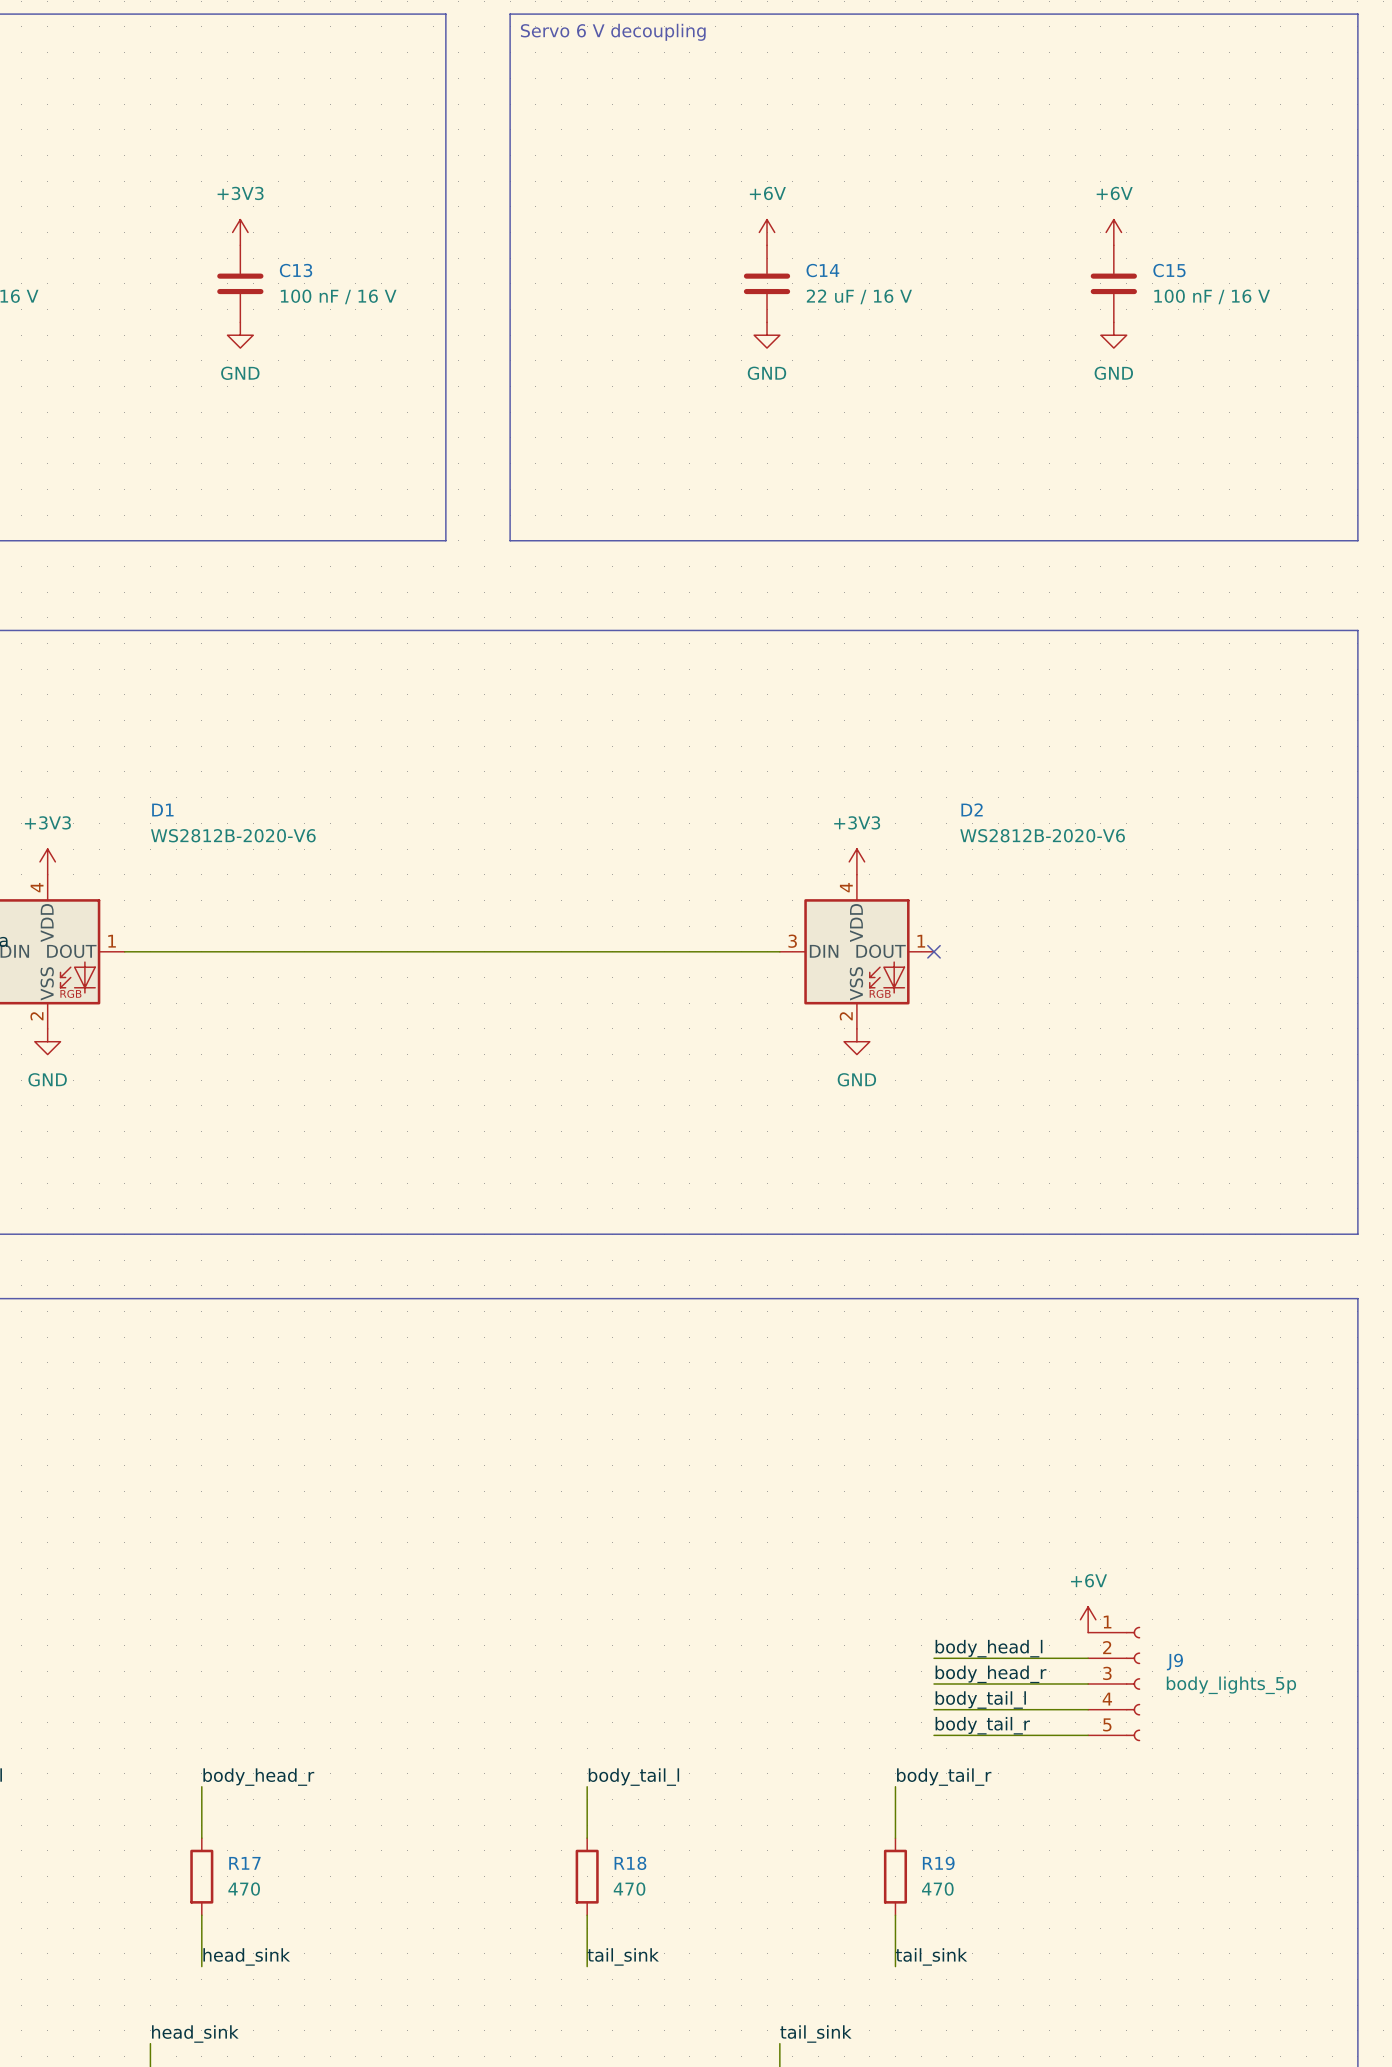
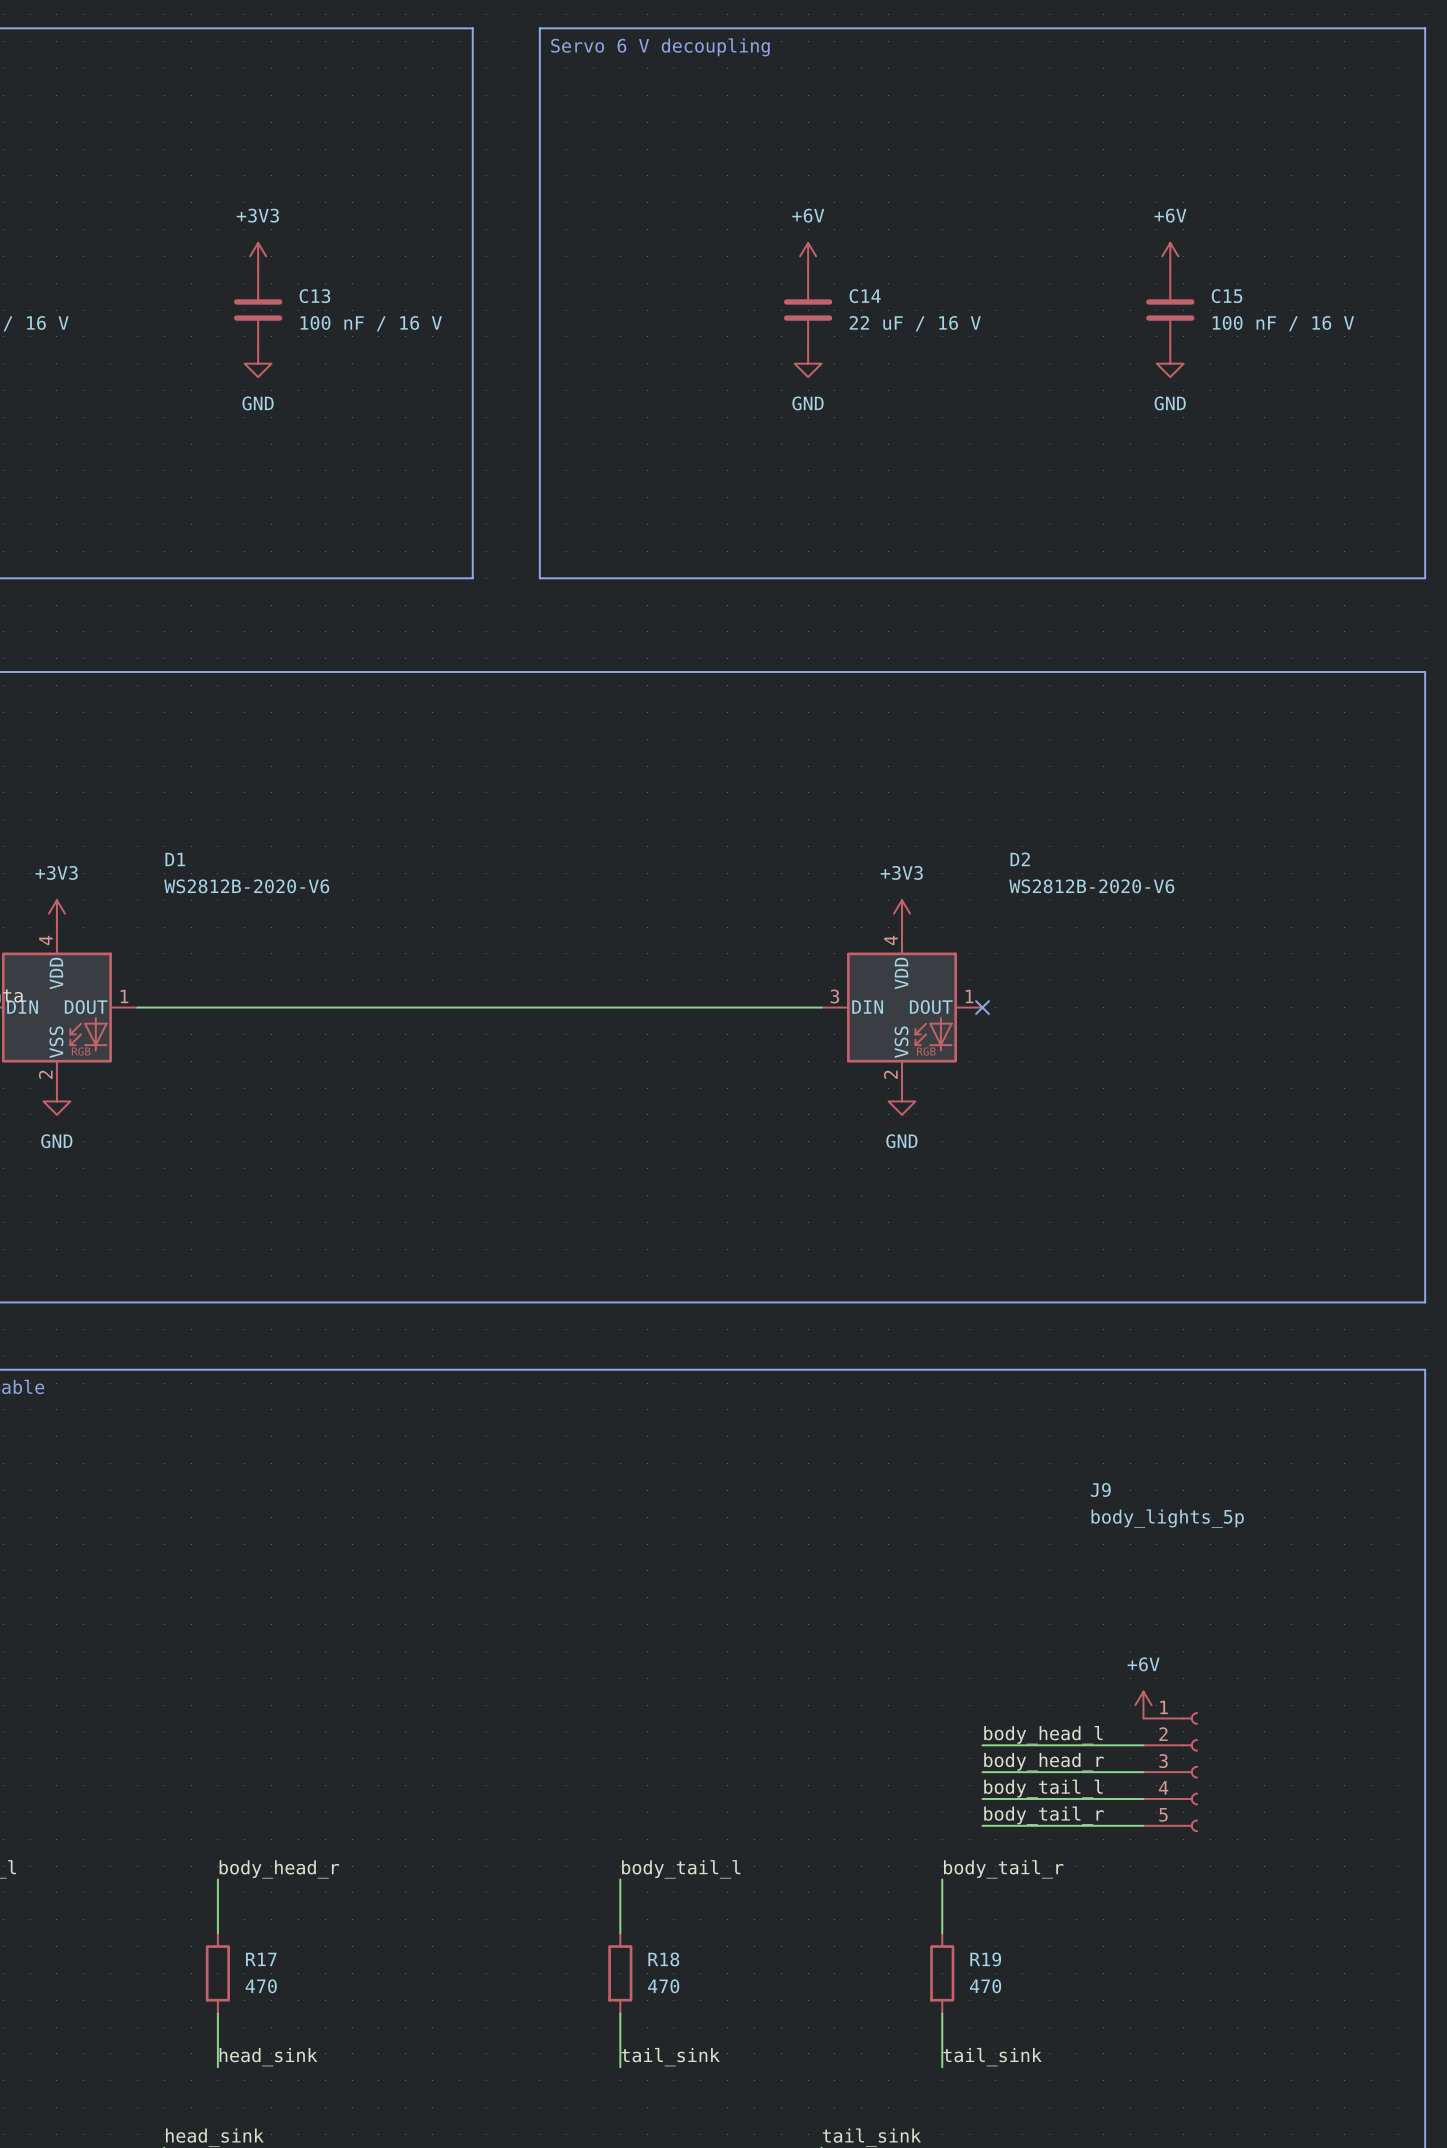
J9 name position: J9 (1174, 1662) -> J9 (1100, 1489)
J9 value position: body_lights_5p (1231, 1685) -> body_lights_5p (1167, 1518)

